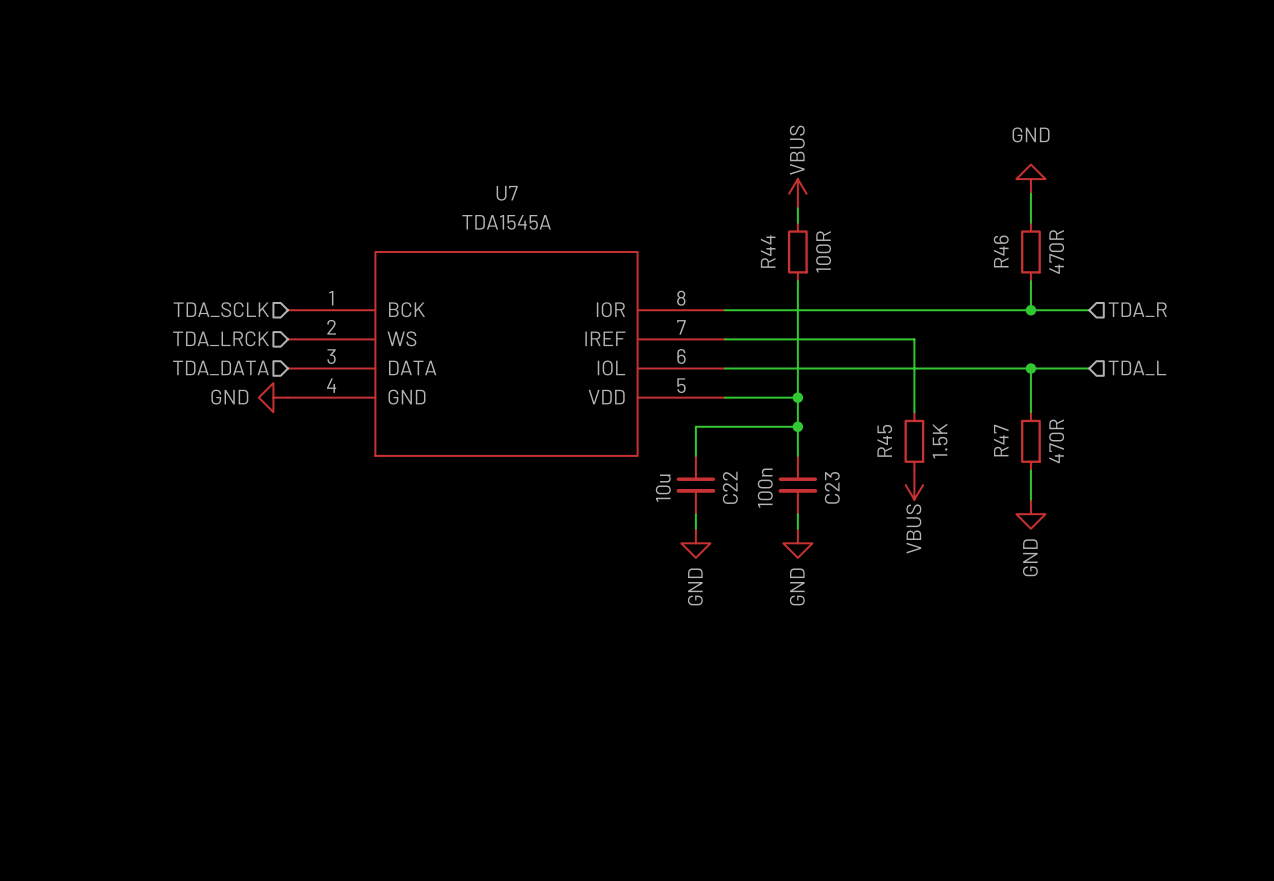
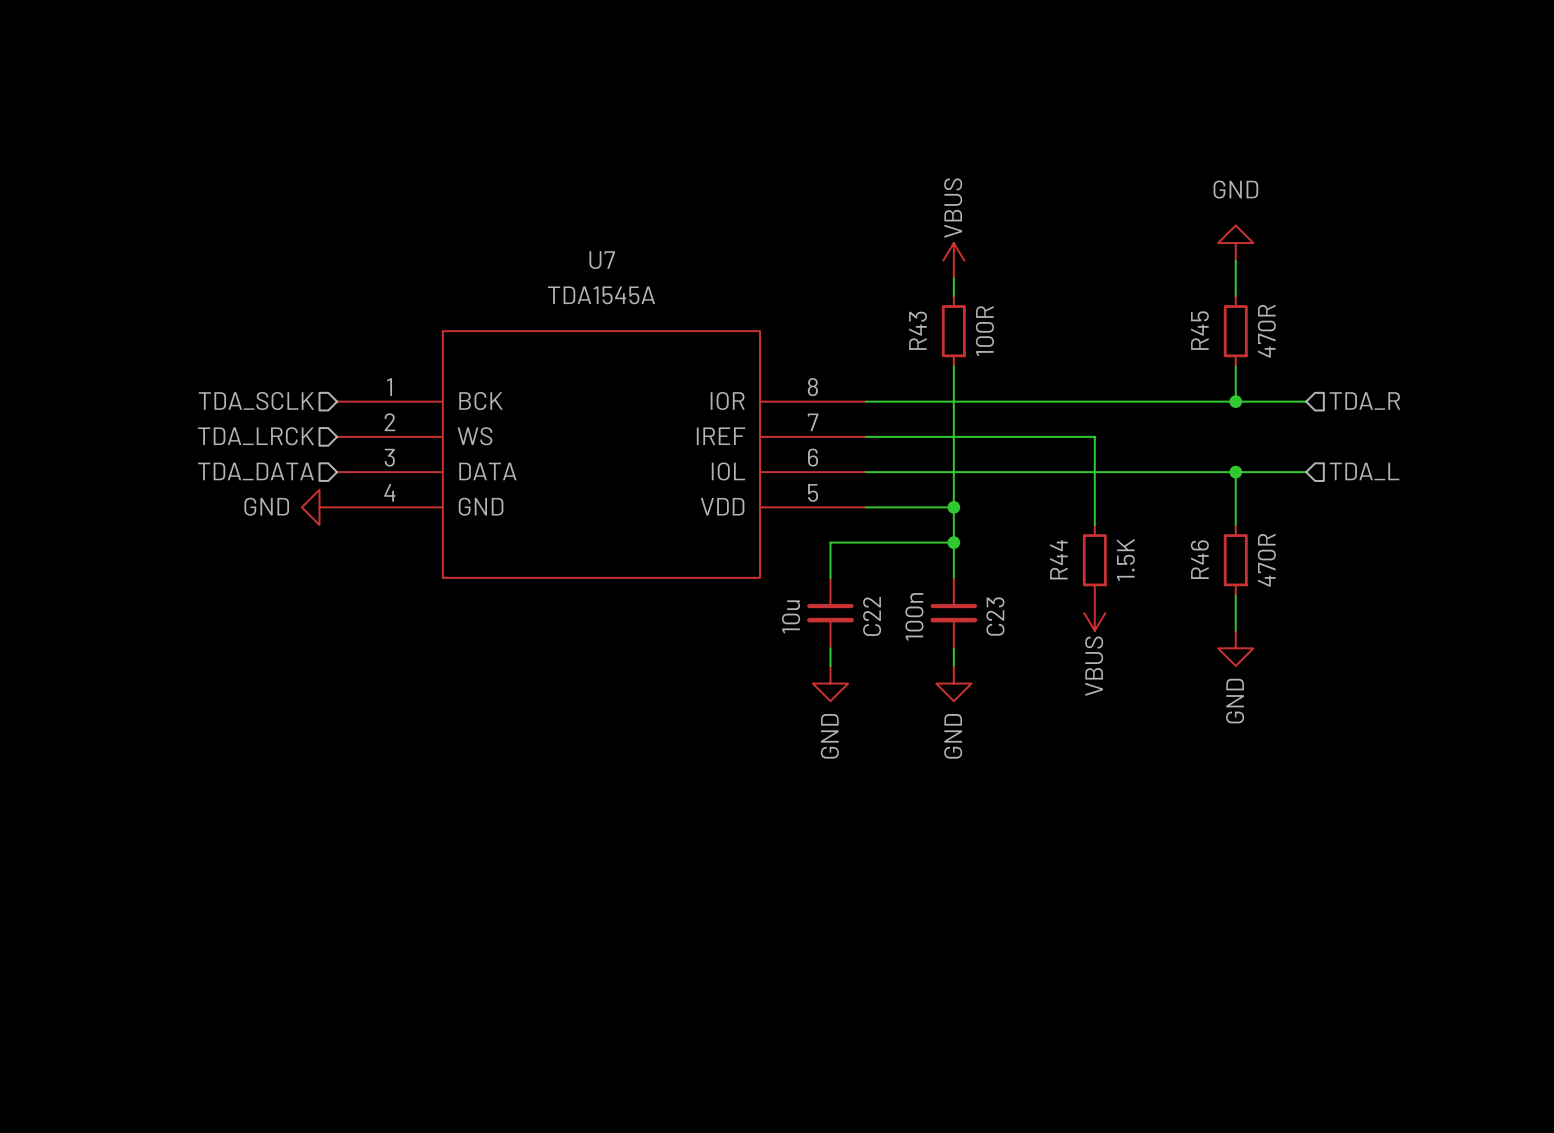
R44 name: R44 (768, 251) -> R43 (918, 330)
R46 name: R46 (1001, 251) -> R45 (1199, 330)
R45 name: R45 (884, 440) -> R44 (1058, 559)
R47 name: R47 (1001, 440) -> R46 (1199, 559)

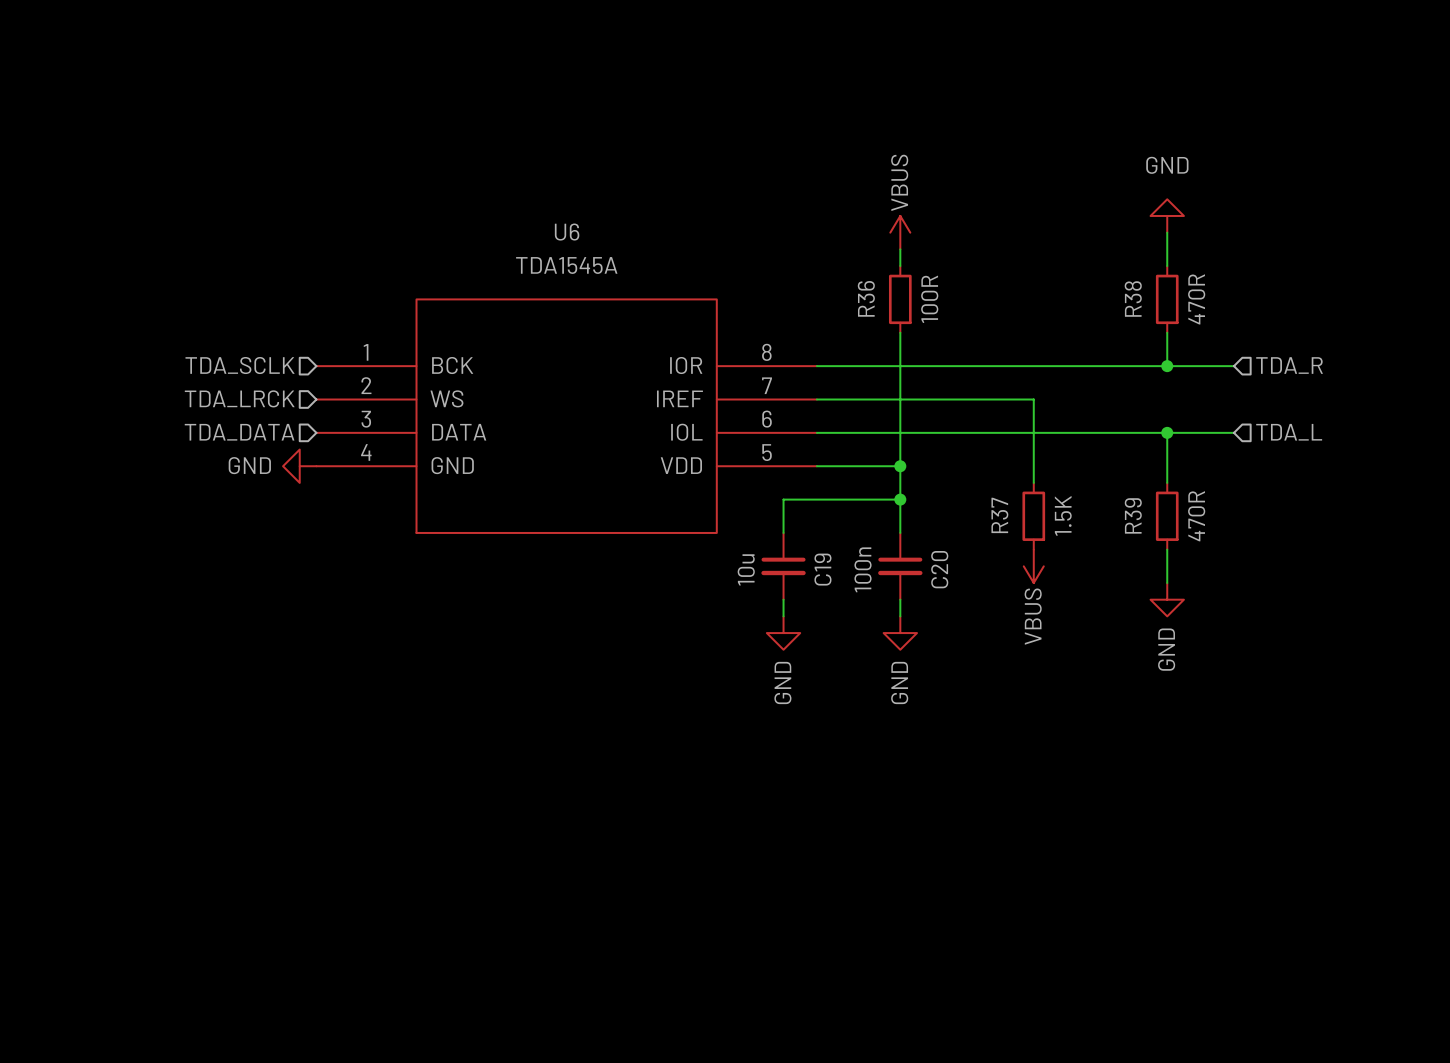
U7 name: U7 (602, 260) -> U6 (567, 232)
R43 name: R43 (918, 330) -> R36 (866, 298)
R45 name: R45 (1199, 330) -> R38 (1133, 299)
R44 name: R44 (1058, 559) -> R37 (999, 515)
R46 name: R46 (1199, 559) -> R39 (1133, 515)
C22 name: C22 (872, 616) -> C19 (822, 569)
C23 name: C23 (995, 616) -> C20 (939, 569)

